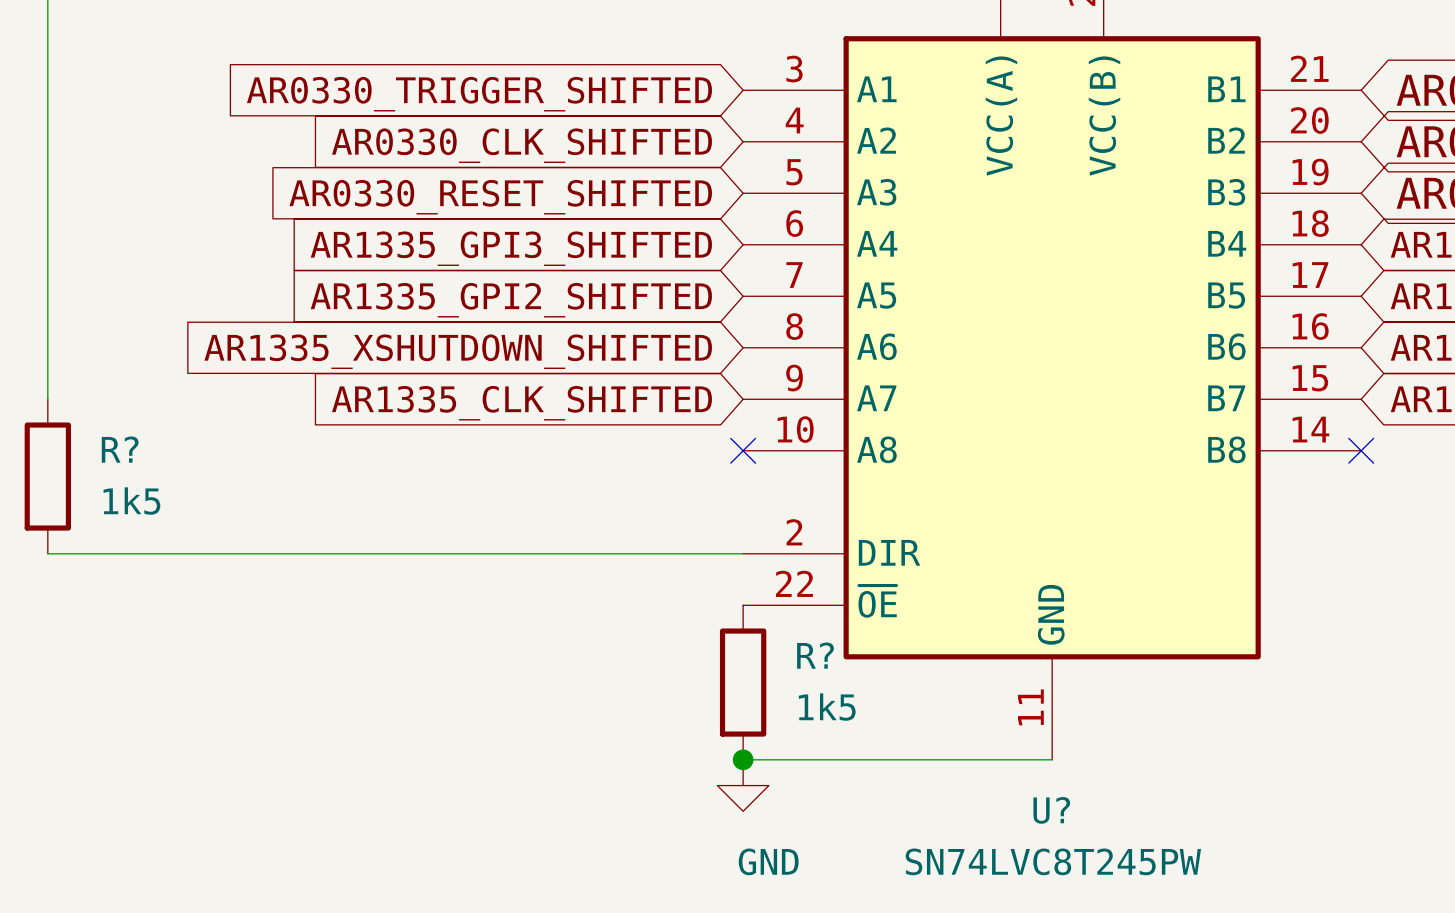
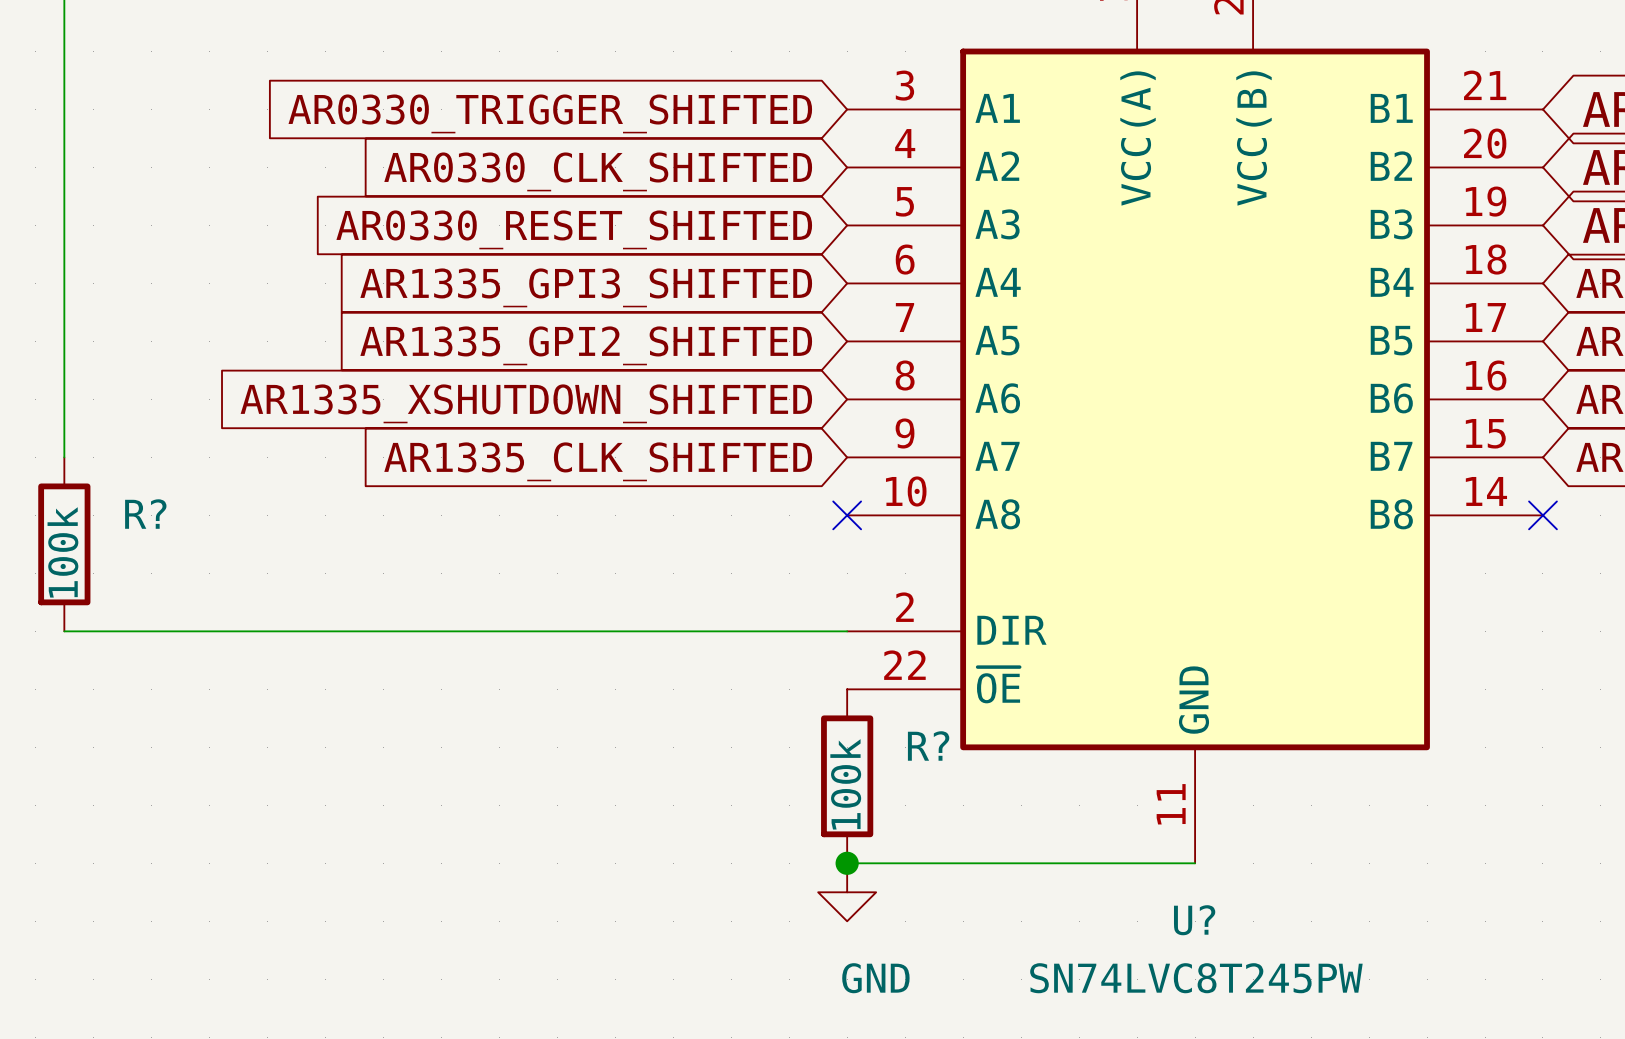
R? value: 1k5 (131, 501) -> 100k (62, 552)
R? value: 1k5 (827, 707) -> 100k (845, 784)

